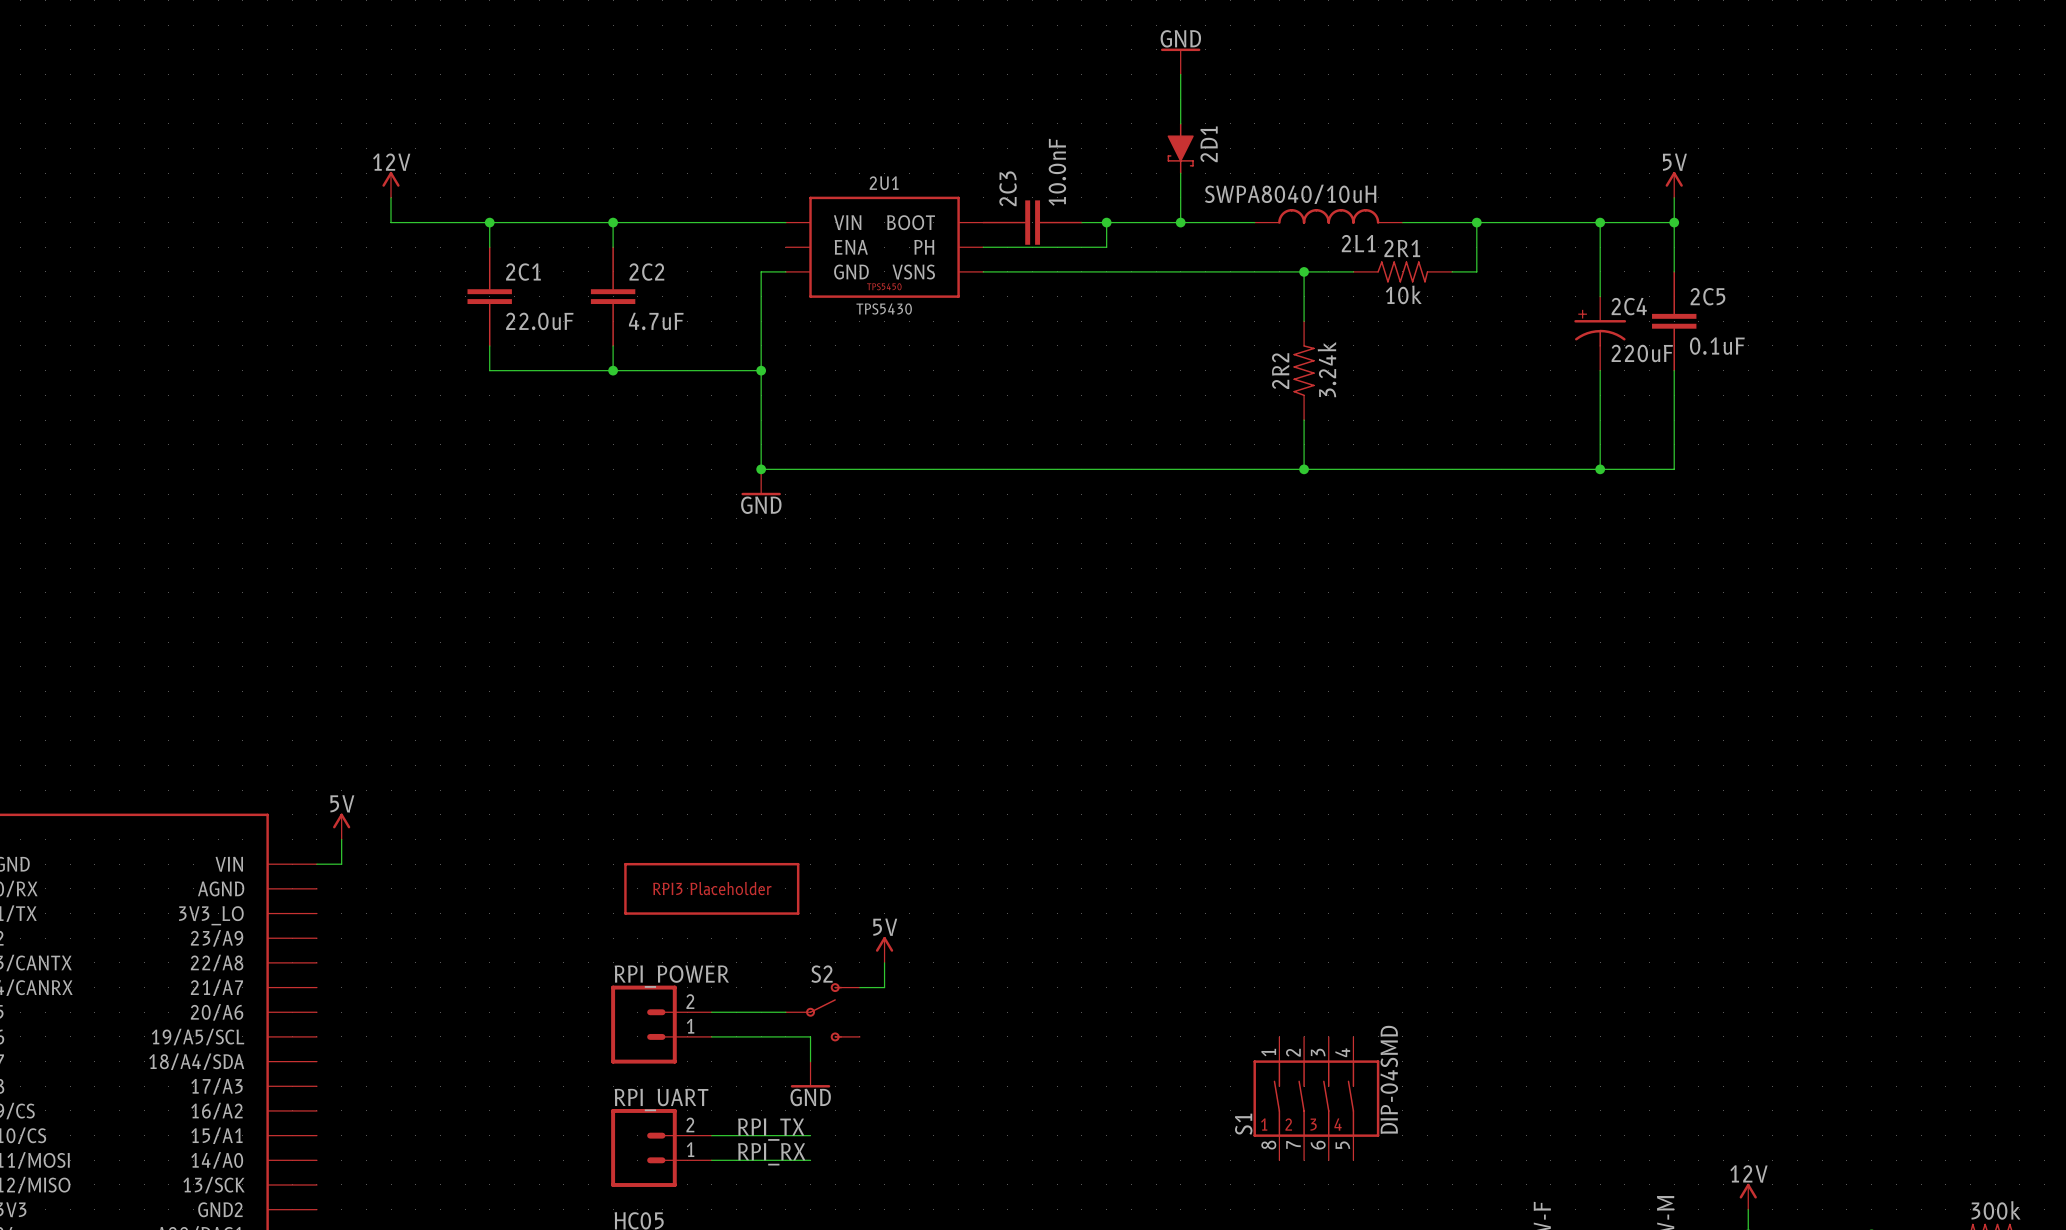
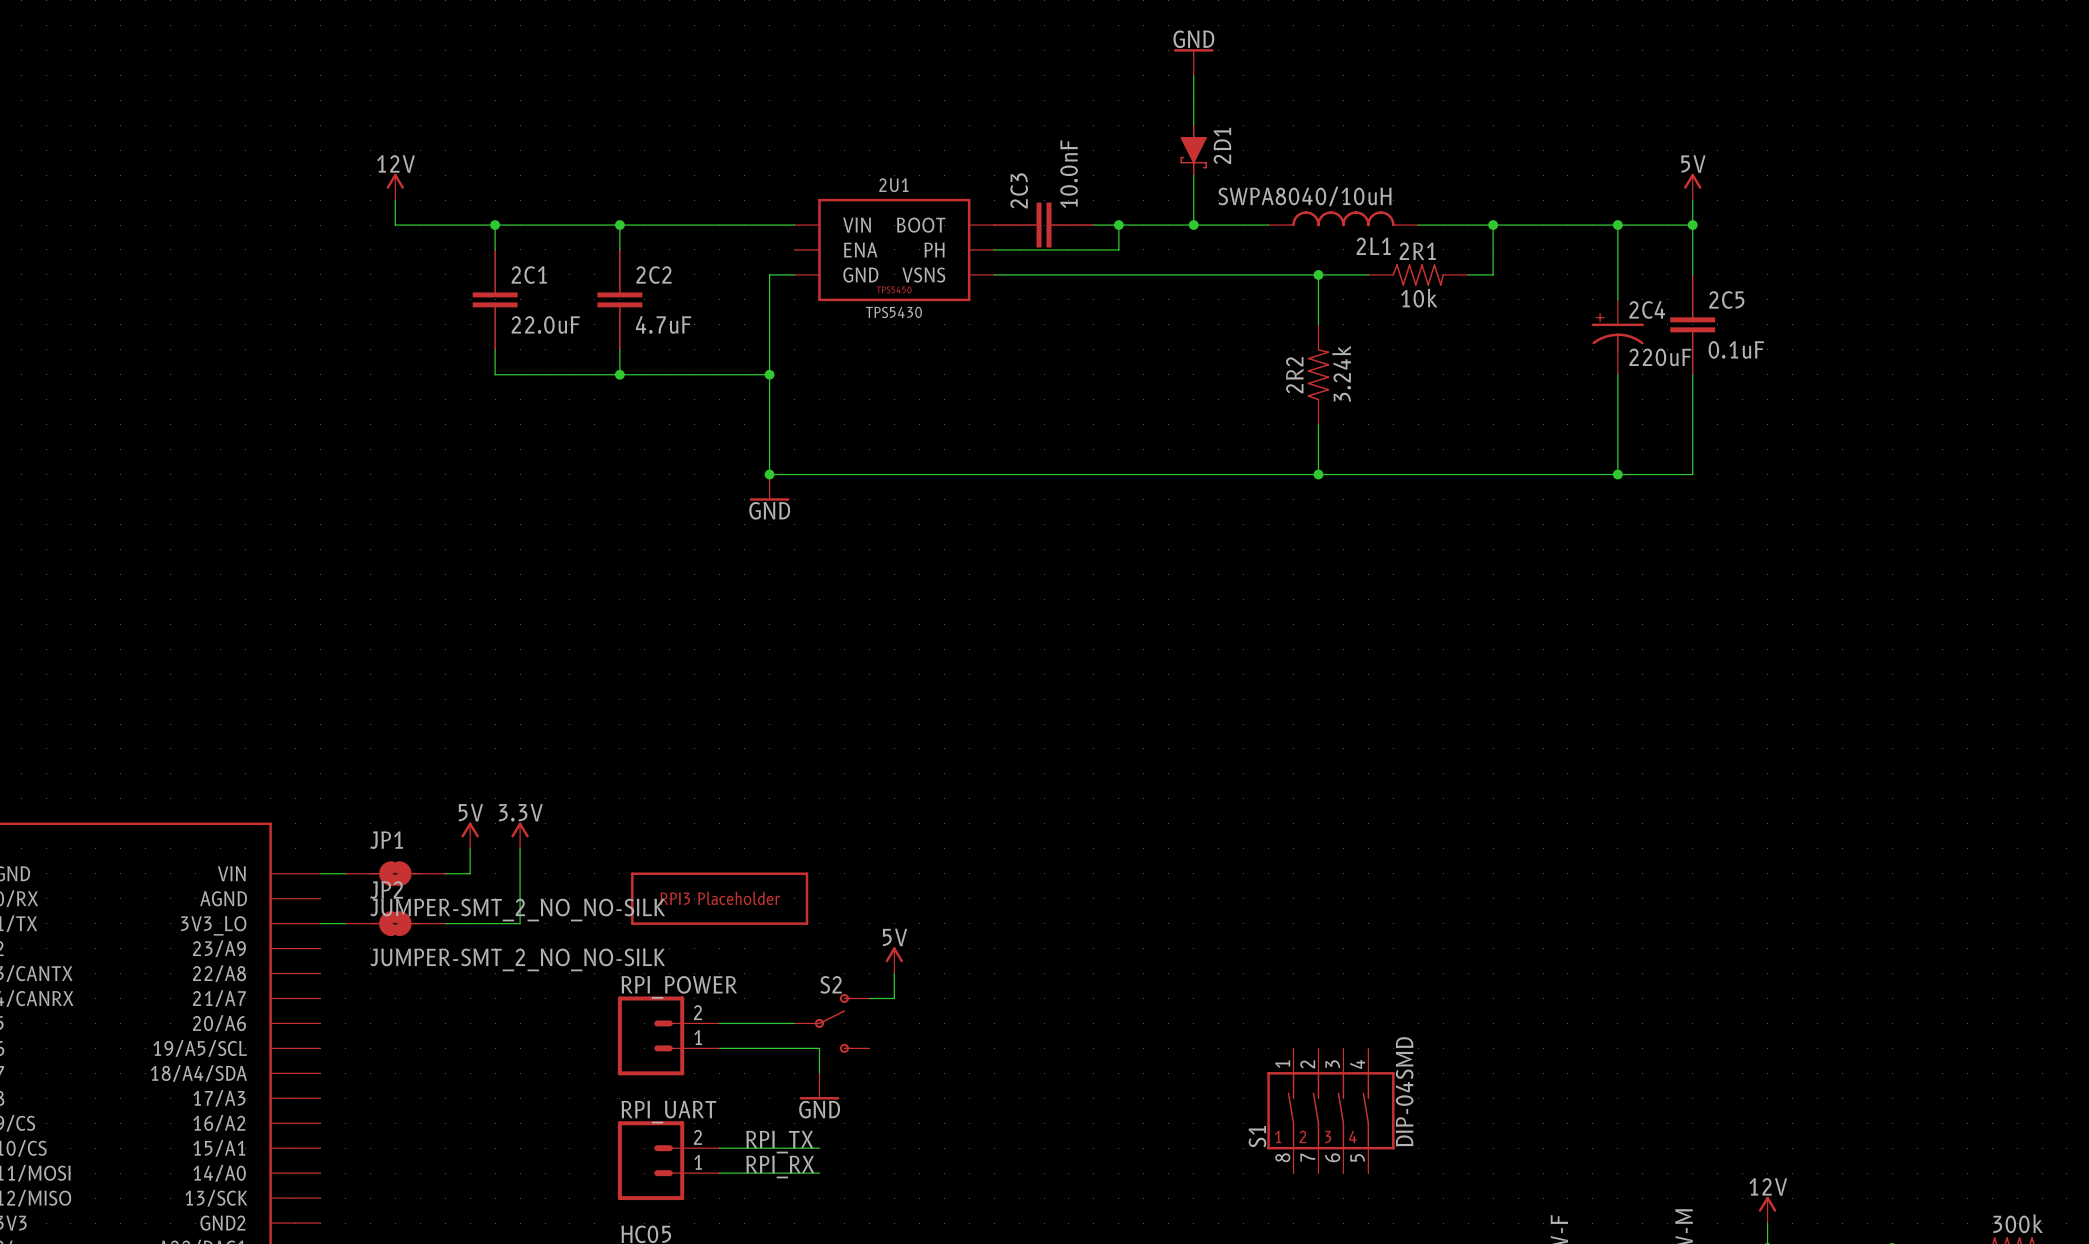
power symbol position: 5V (341, 826) -> 5V (470, 835)
power symbol: none -> 3.3V (520, 835)
wire: (341, 839) (341, 864) -> none
wire: none -> (470, 848) (470, 873) (445, 873)
wire: none -> (520, 848) (520, 923) (445, 923)
JP1: none -> JUMPER-SMT_2_NO_NO-SILK (395, 873)
wire: none -> (320, 923) (345, 923)
JP2: none -> JUMPER-SMT_2_NO_NO-SILK (395, 923)

